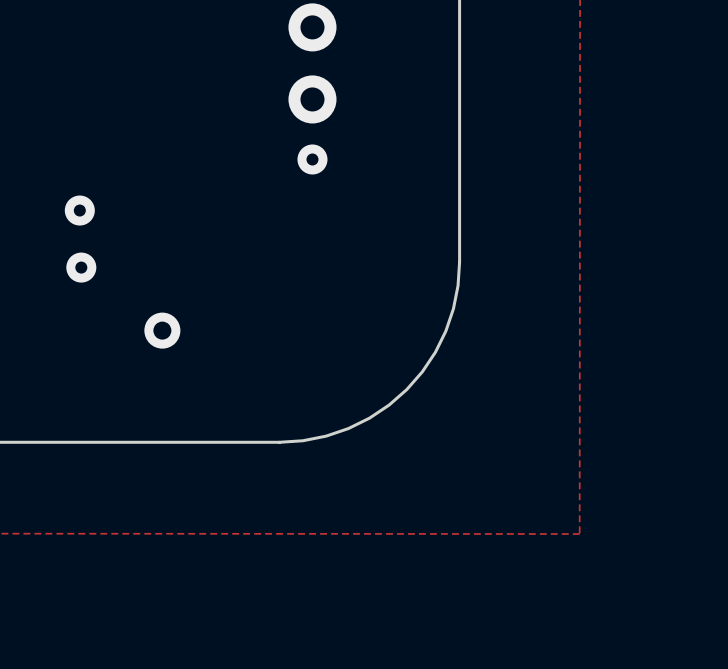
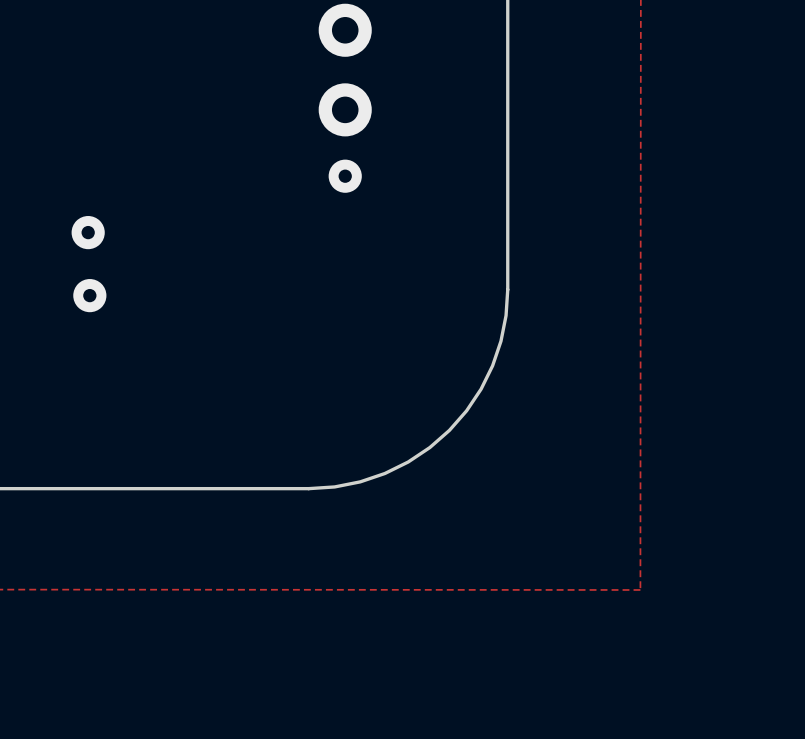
via: (162, 330) -> none

